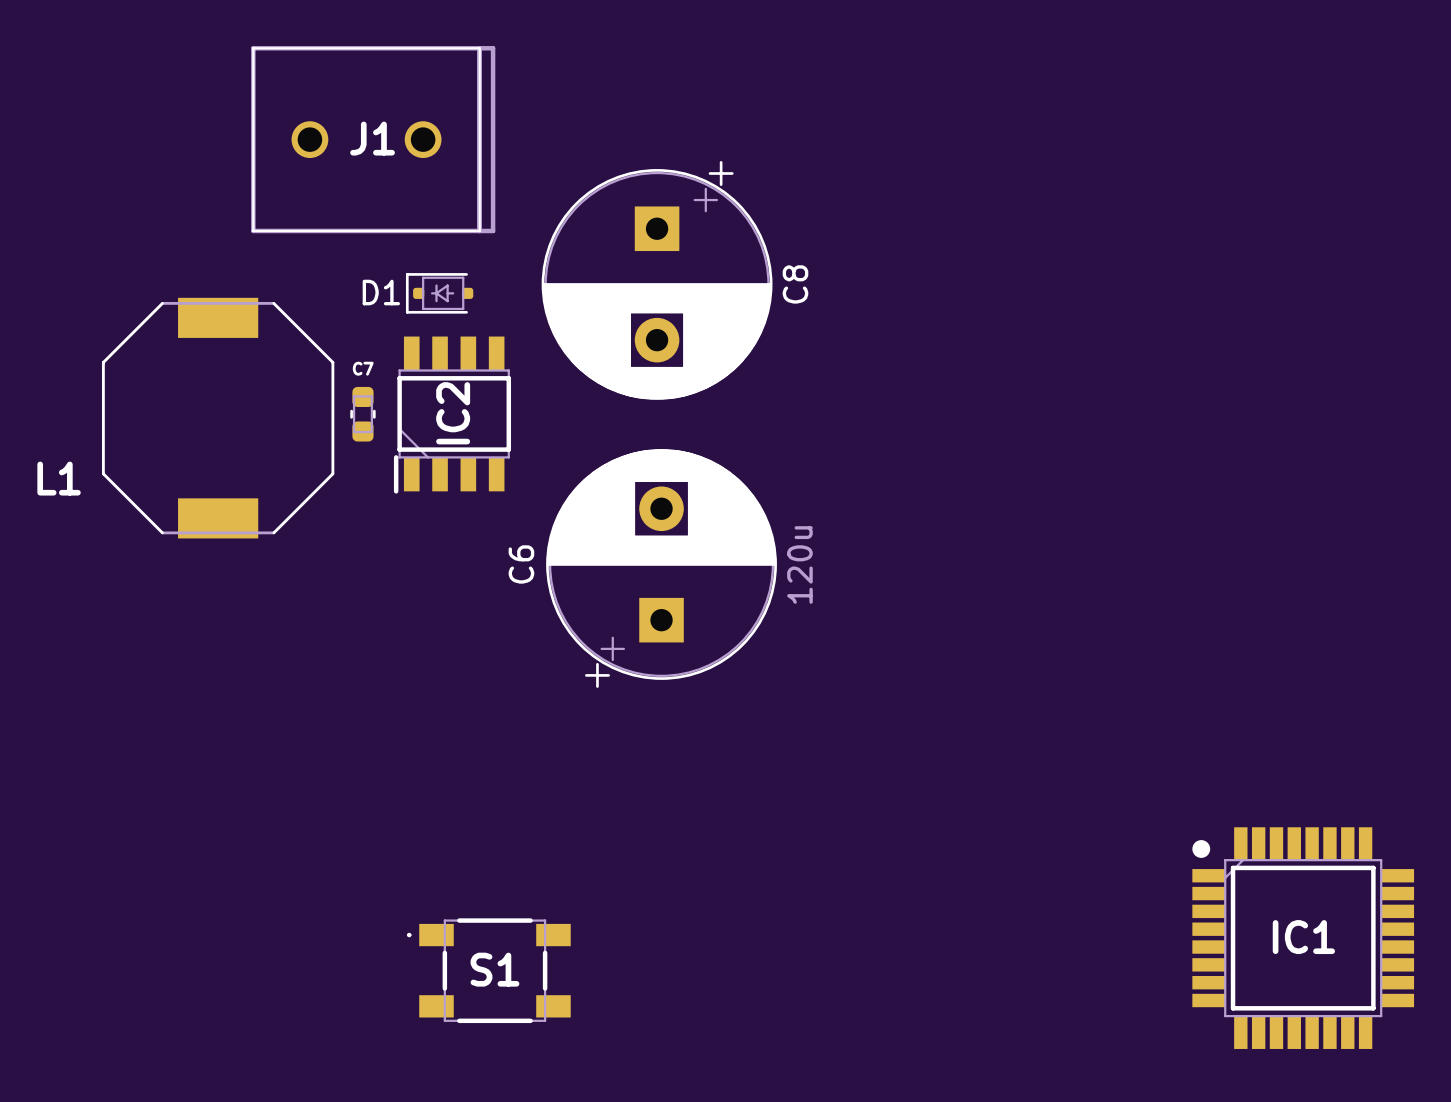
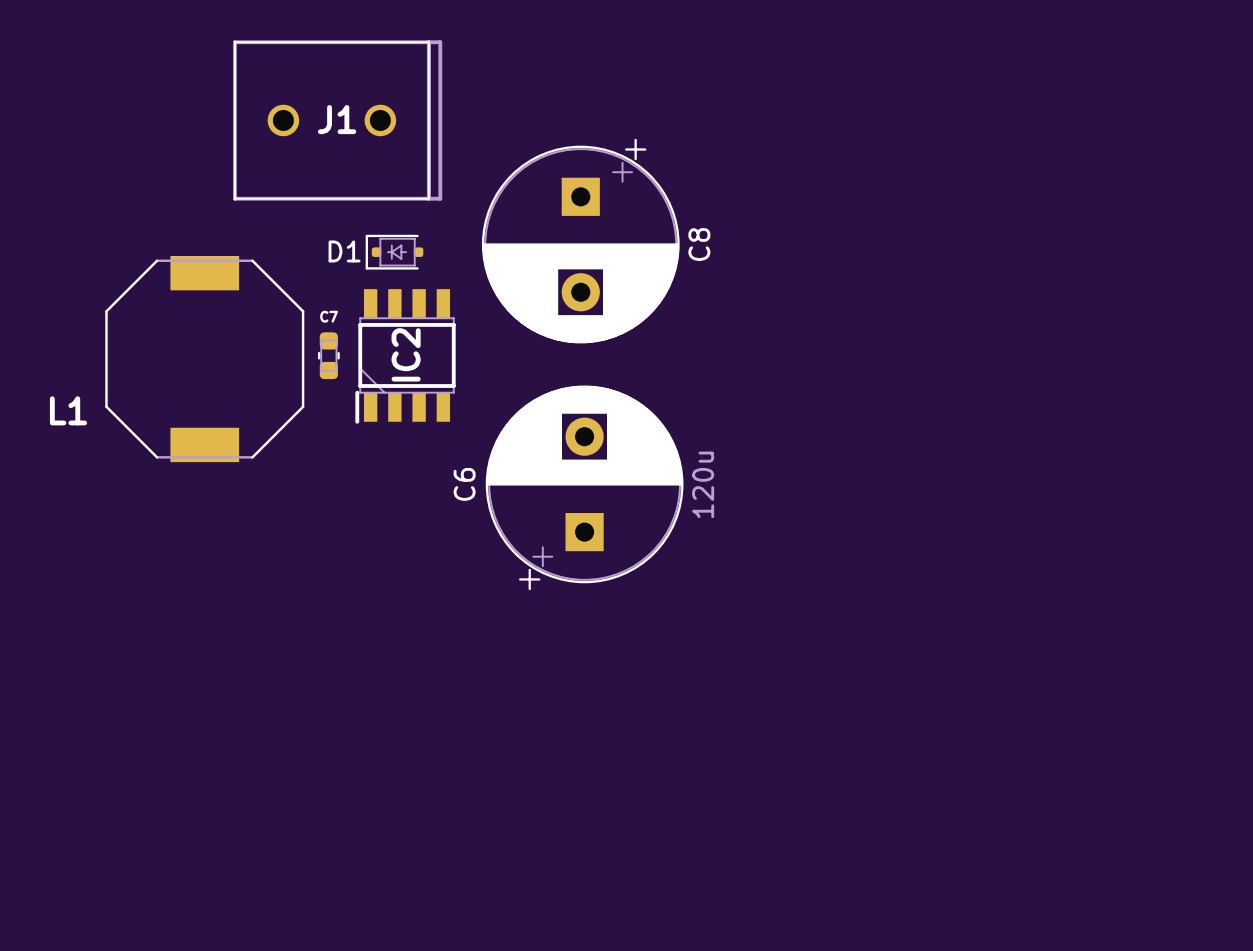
IC1: (1303, 938) -> none
S1: (488, 970) -> none

